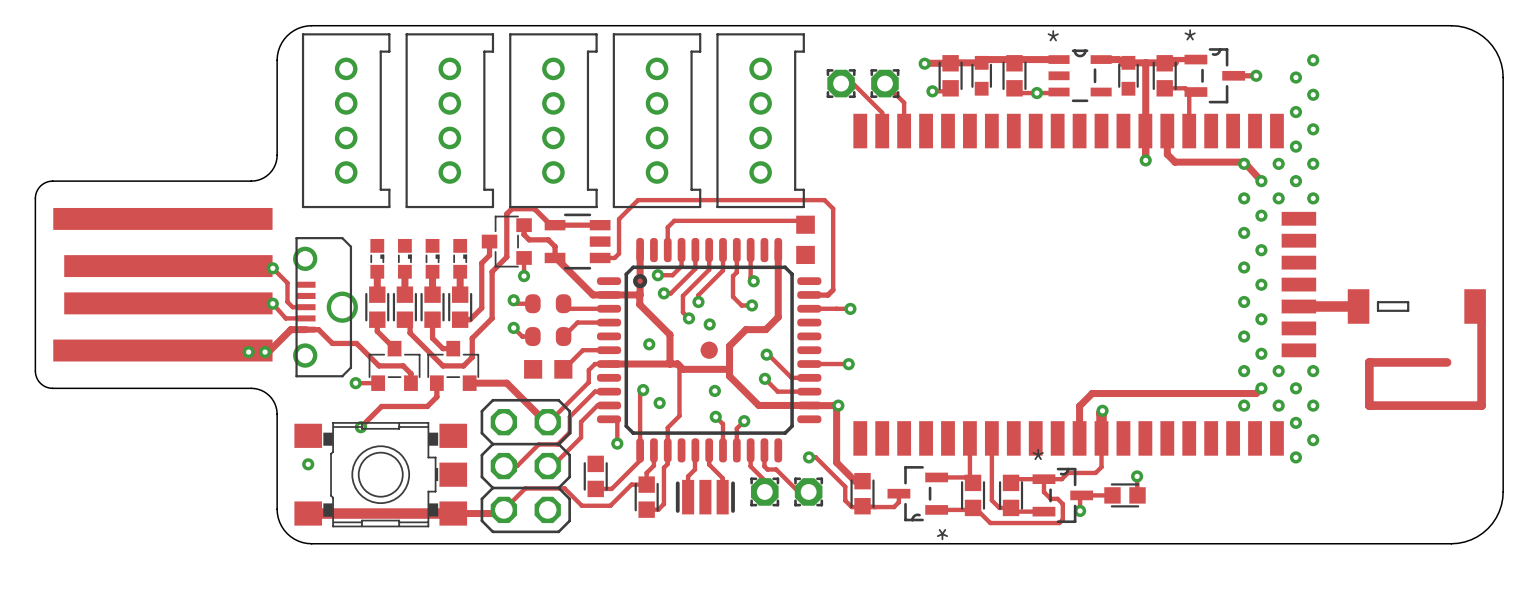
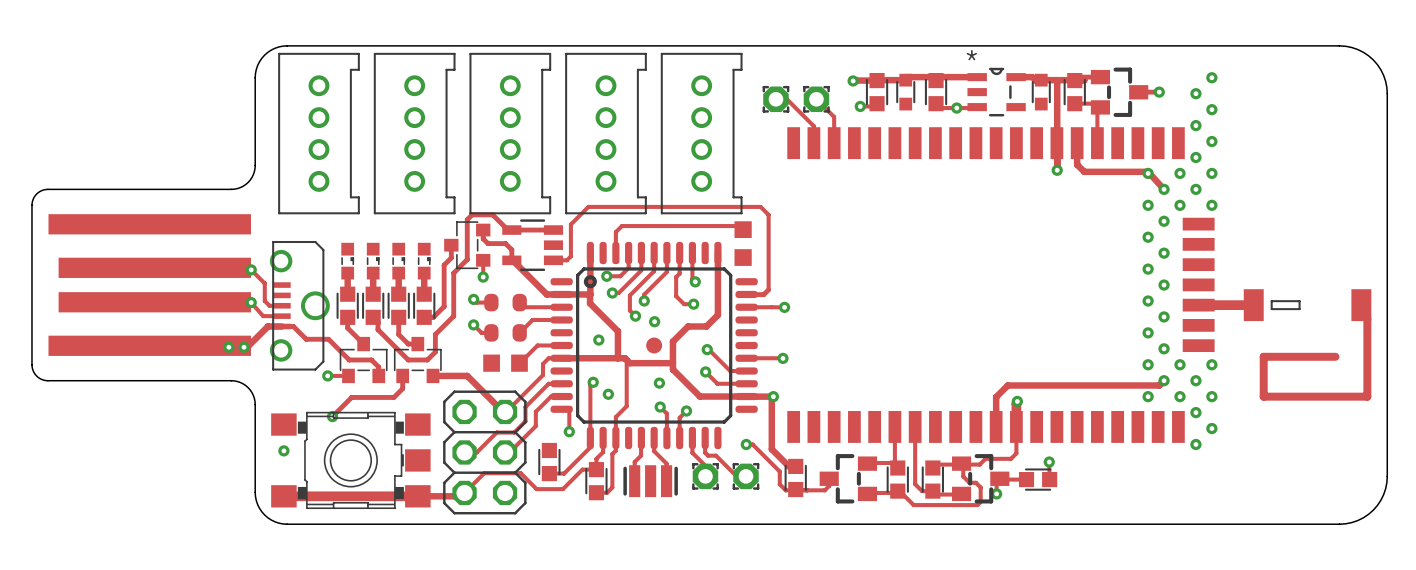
part footprint: [1184, 48, 1246, 104] -> [1090, 67, 1149, 117]
part footprint: [887, 466, 949, 522] -> [819, 454, 878, 504]
part footprint: [1032, 467, 1094, 524] -> [951, 454, 1010, 504]

